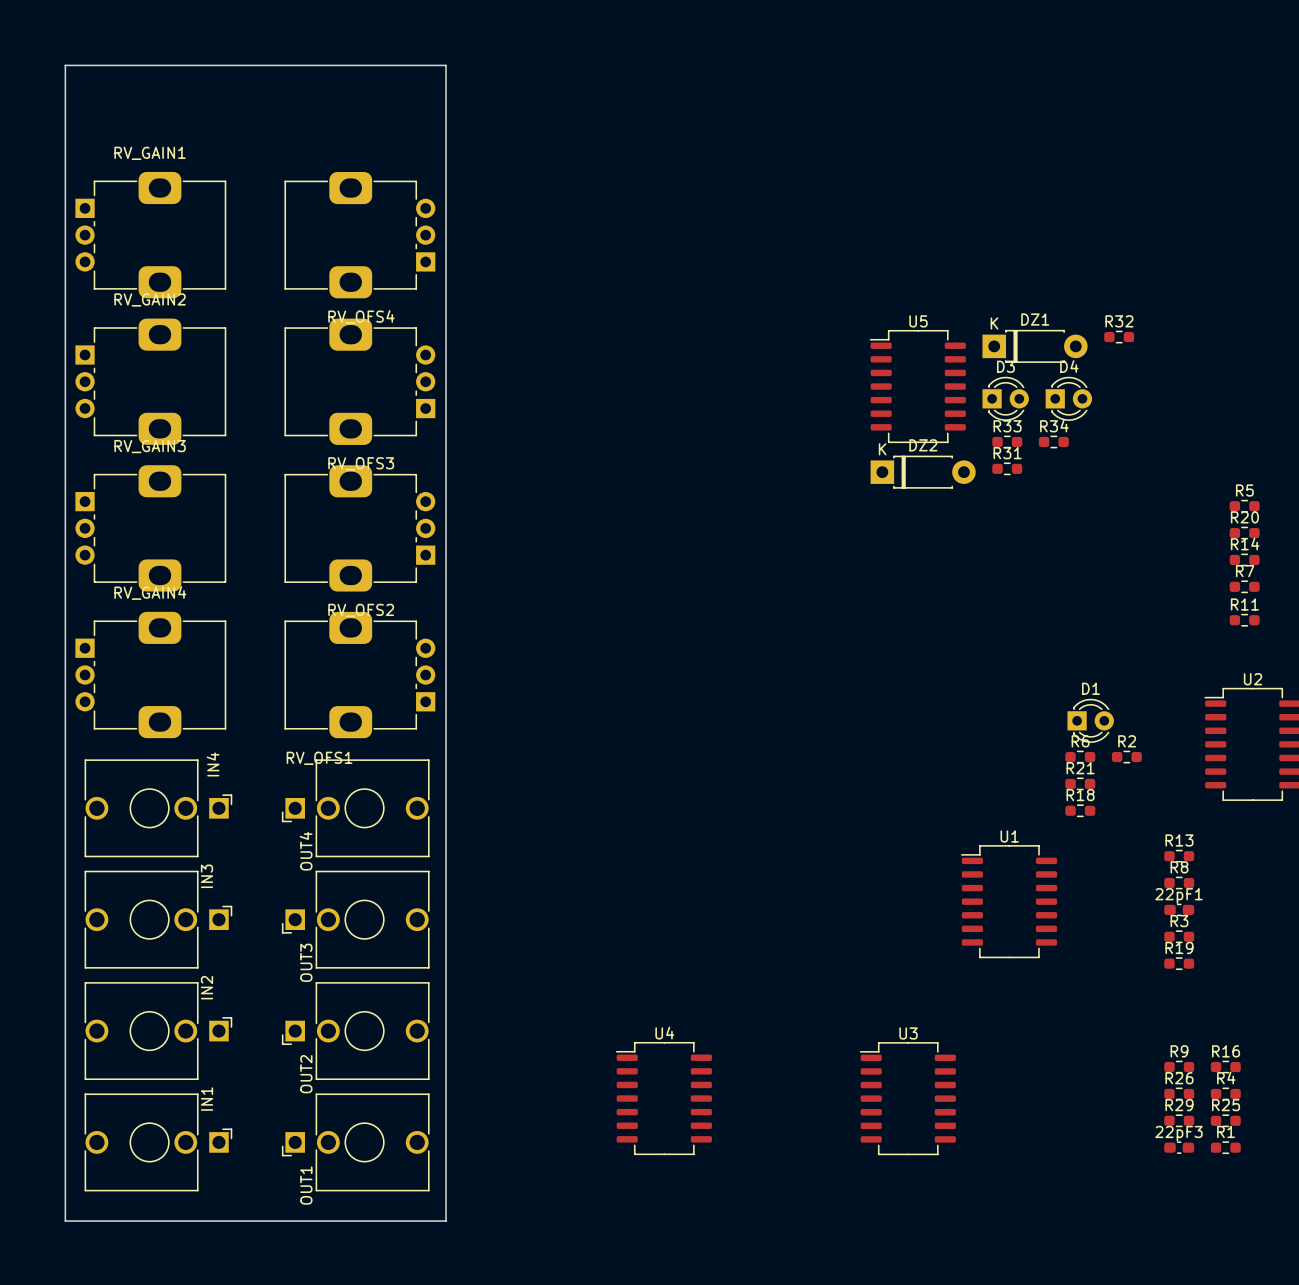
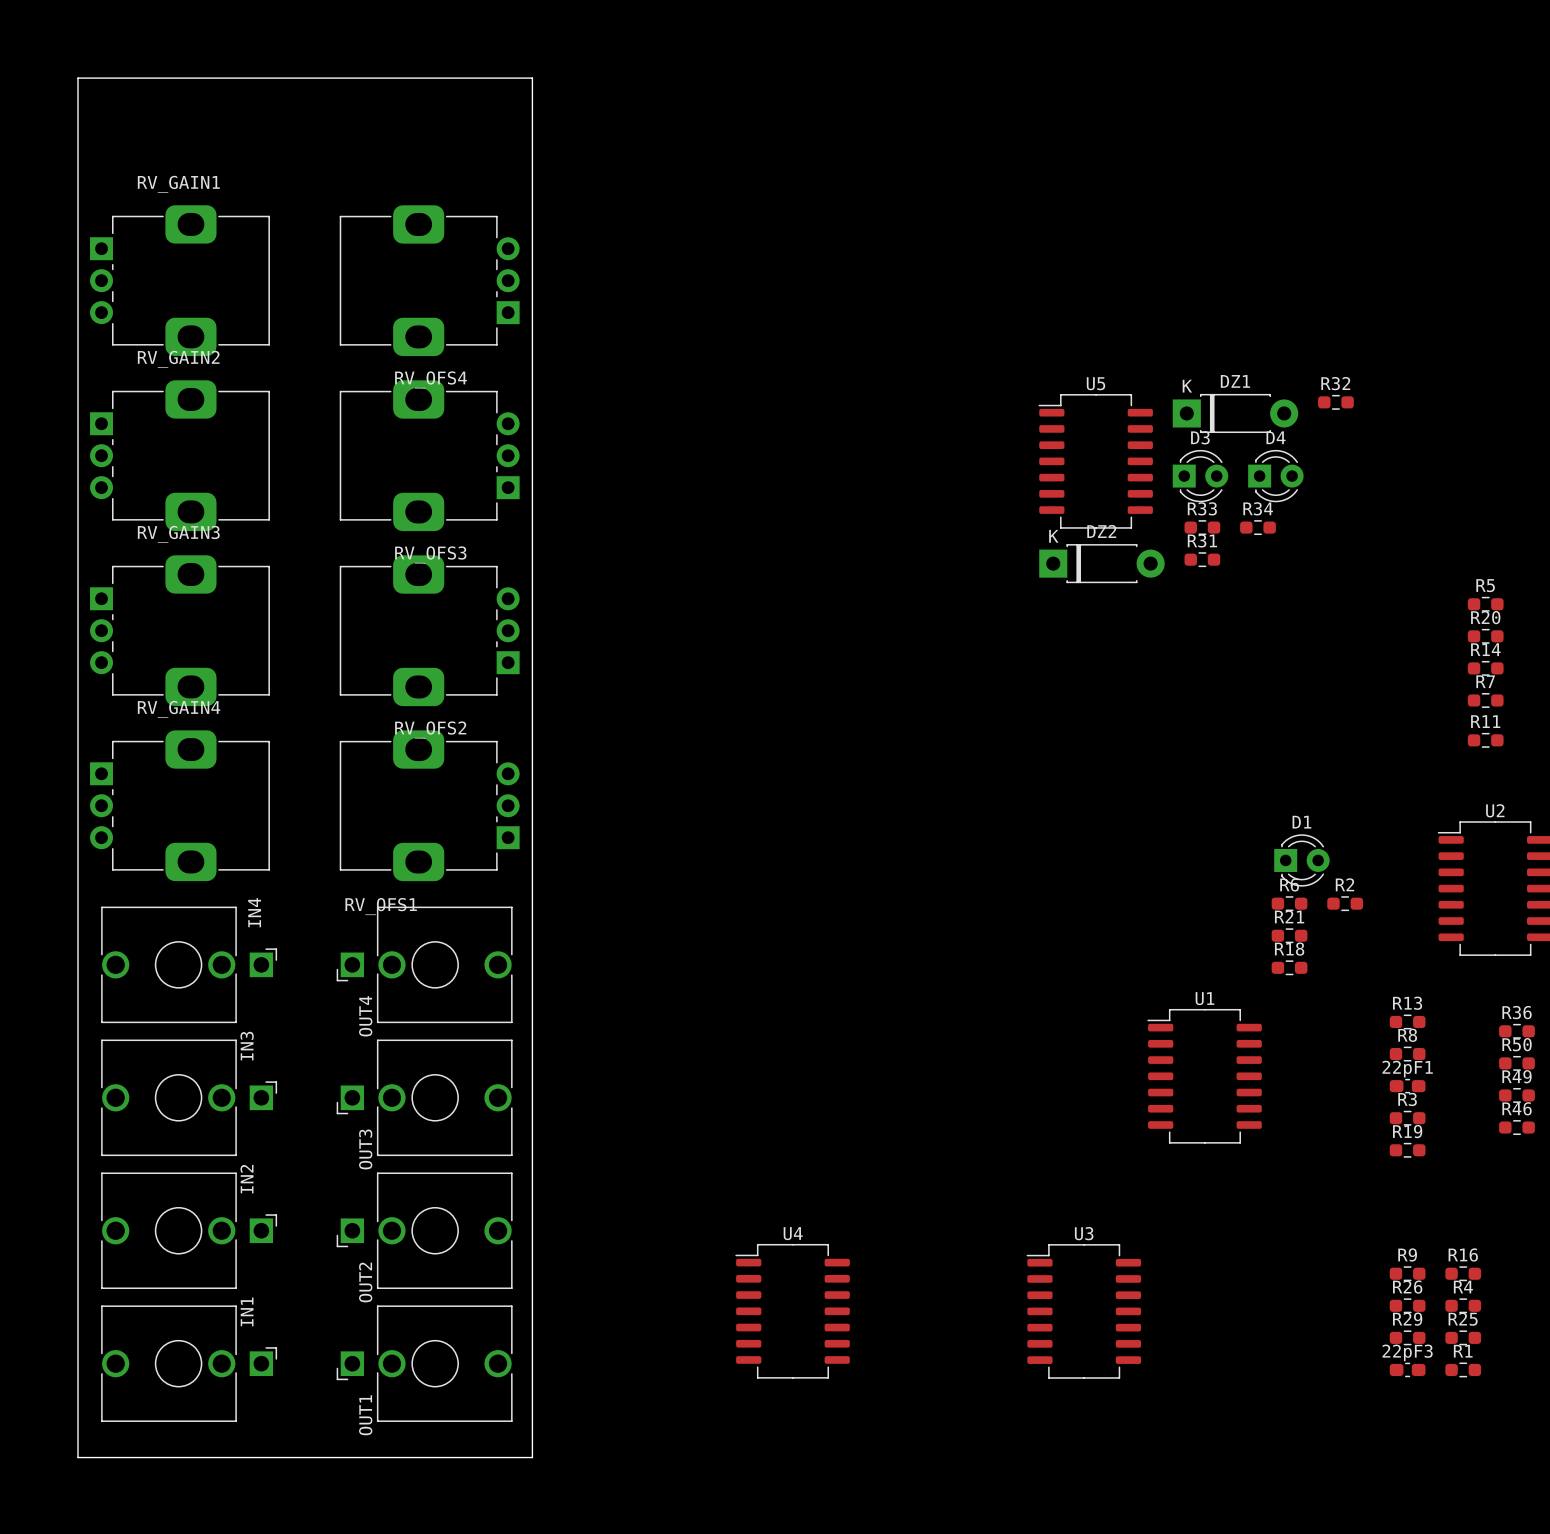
R36: none -> (1517, 1031)
R50: none -> (1517, 1063)
R49: none -> (1517, 1095)
R46: none -> (1517, 1127)

